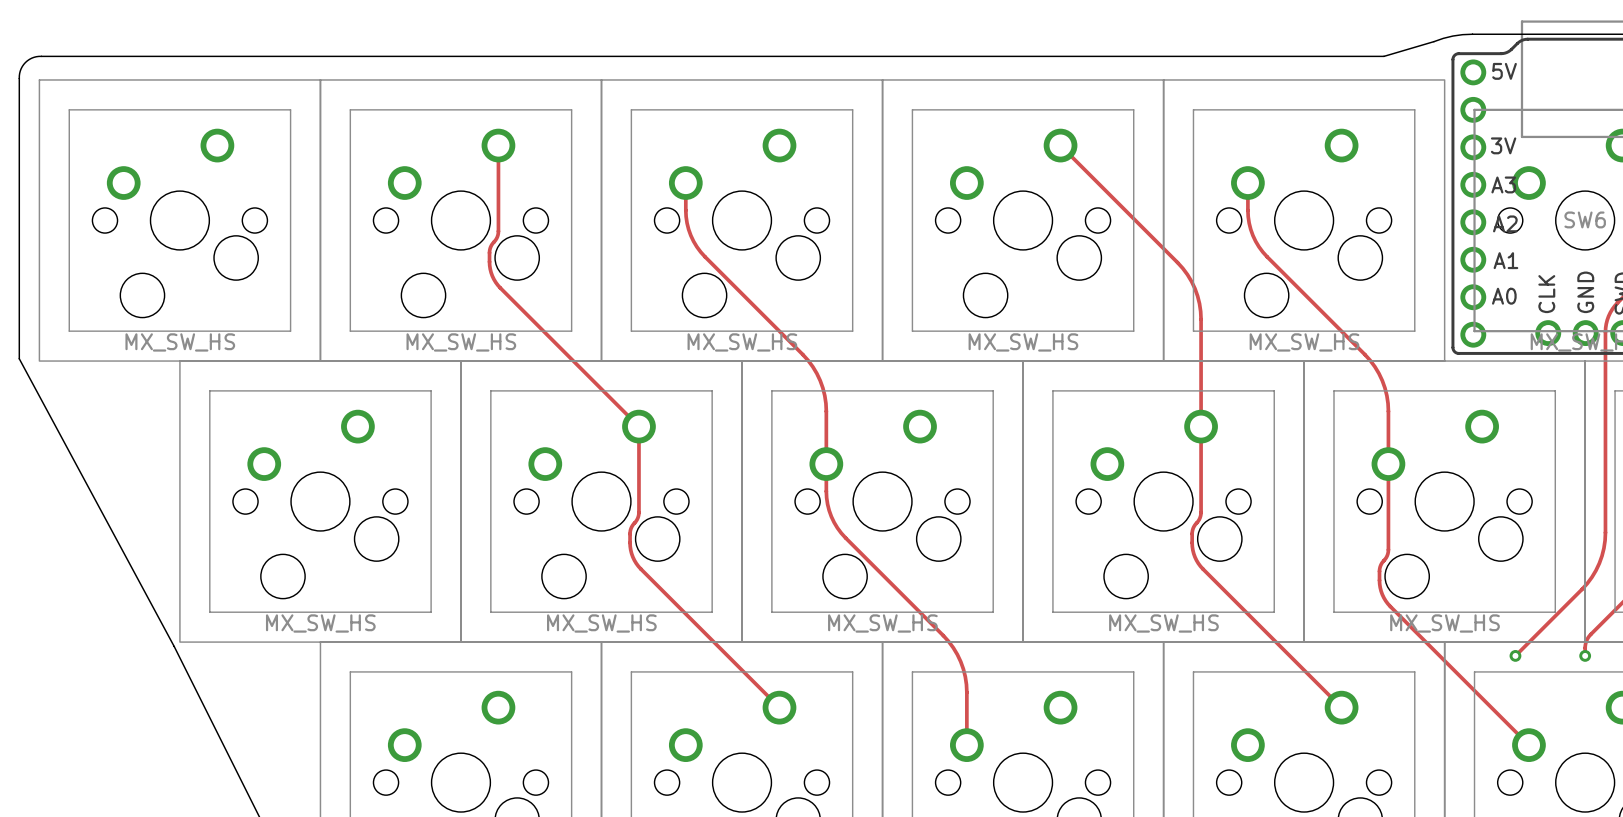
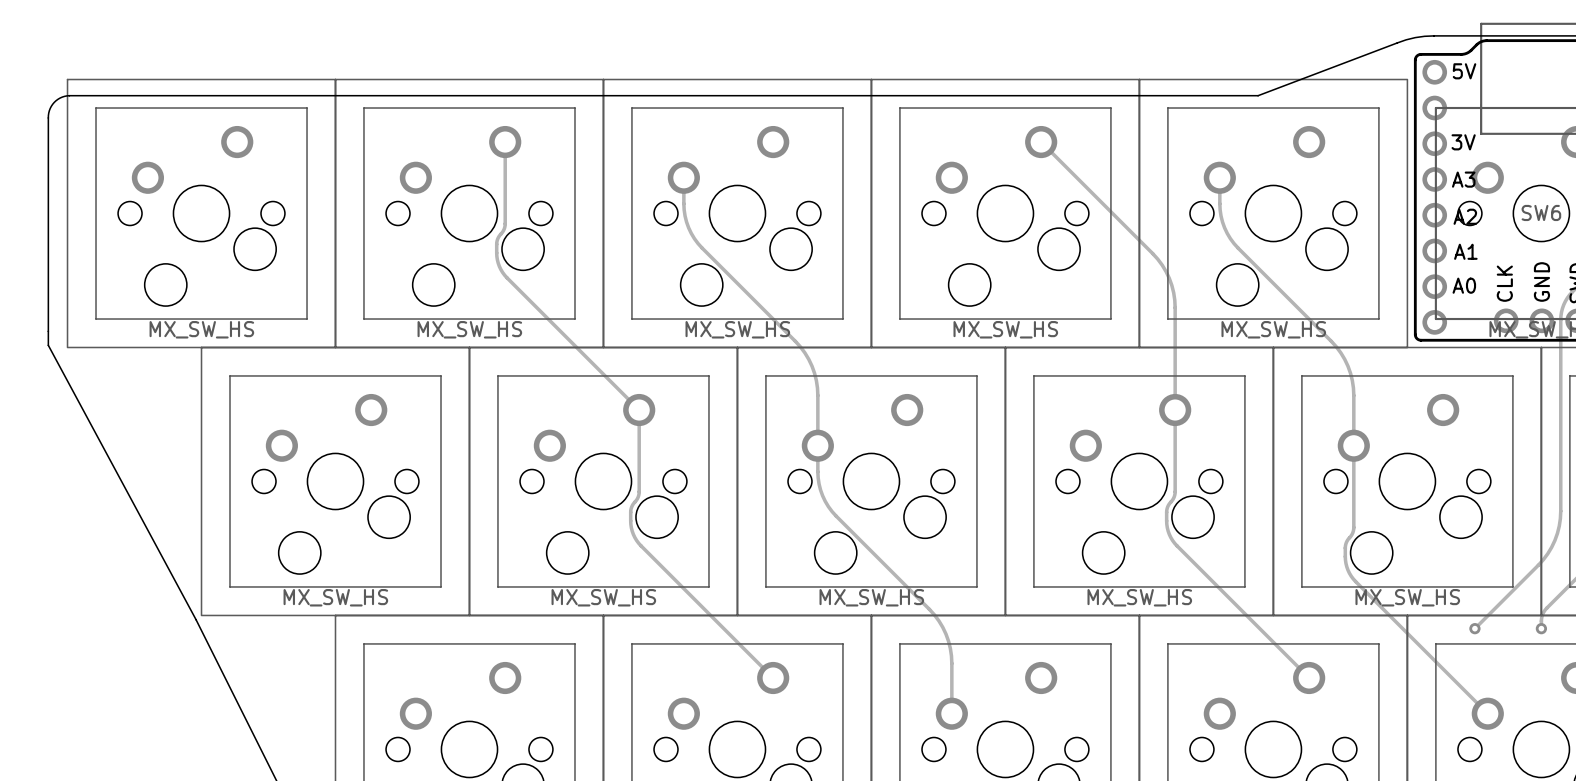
board edge: (1434, 41) (1383, 56) (38, 56) (27, 60) (20, 71) (19, 120) -> (1397, 42) (1258, 95) (69, 95) (60, 98) (54, 102) (50, 108) (48, 117)

